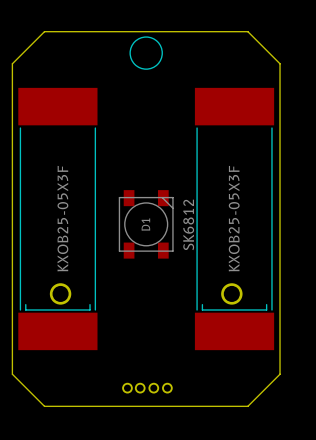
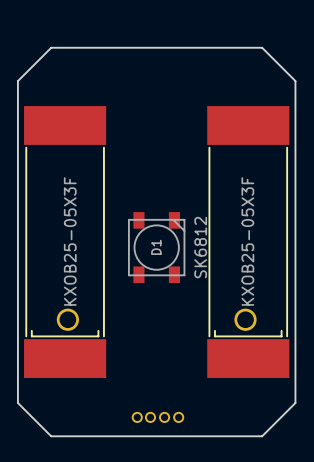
drawing: [129, 36, 163, 70] -> none

